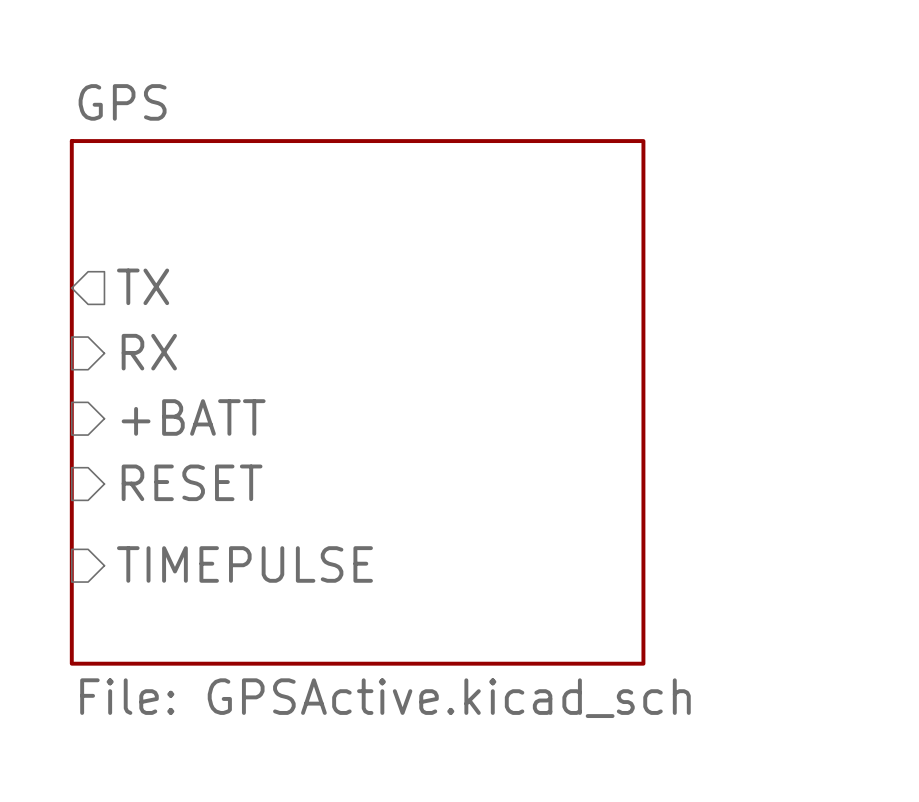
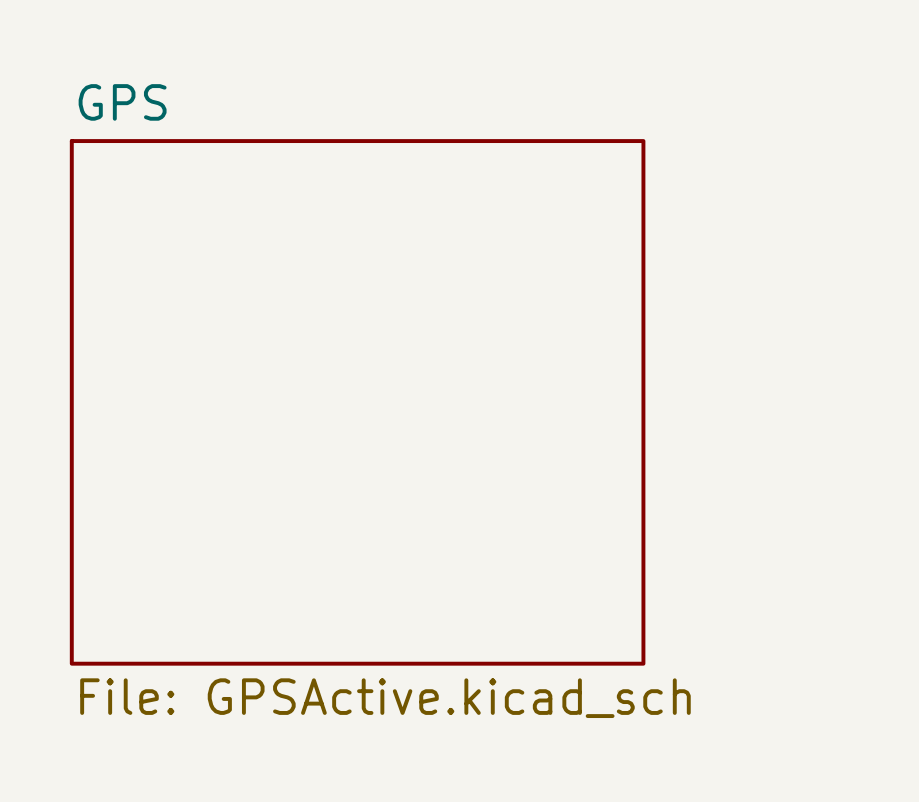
sheet pin: TX (143, 286) -> none
sheet pin: RX (149, 352) -> none
sheet pin: +BATT (193, 417) -> none
sheet pin: RESET (192, 482) -> none
sheet pin: TIMEPULSE (244, 564) -> none

